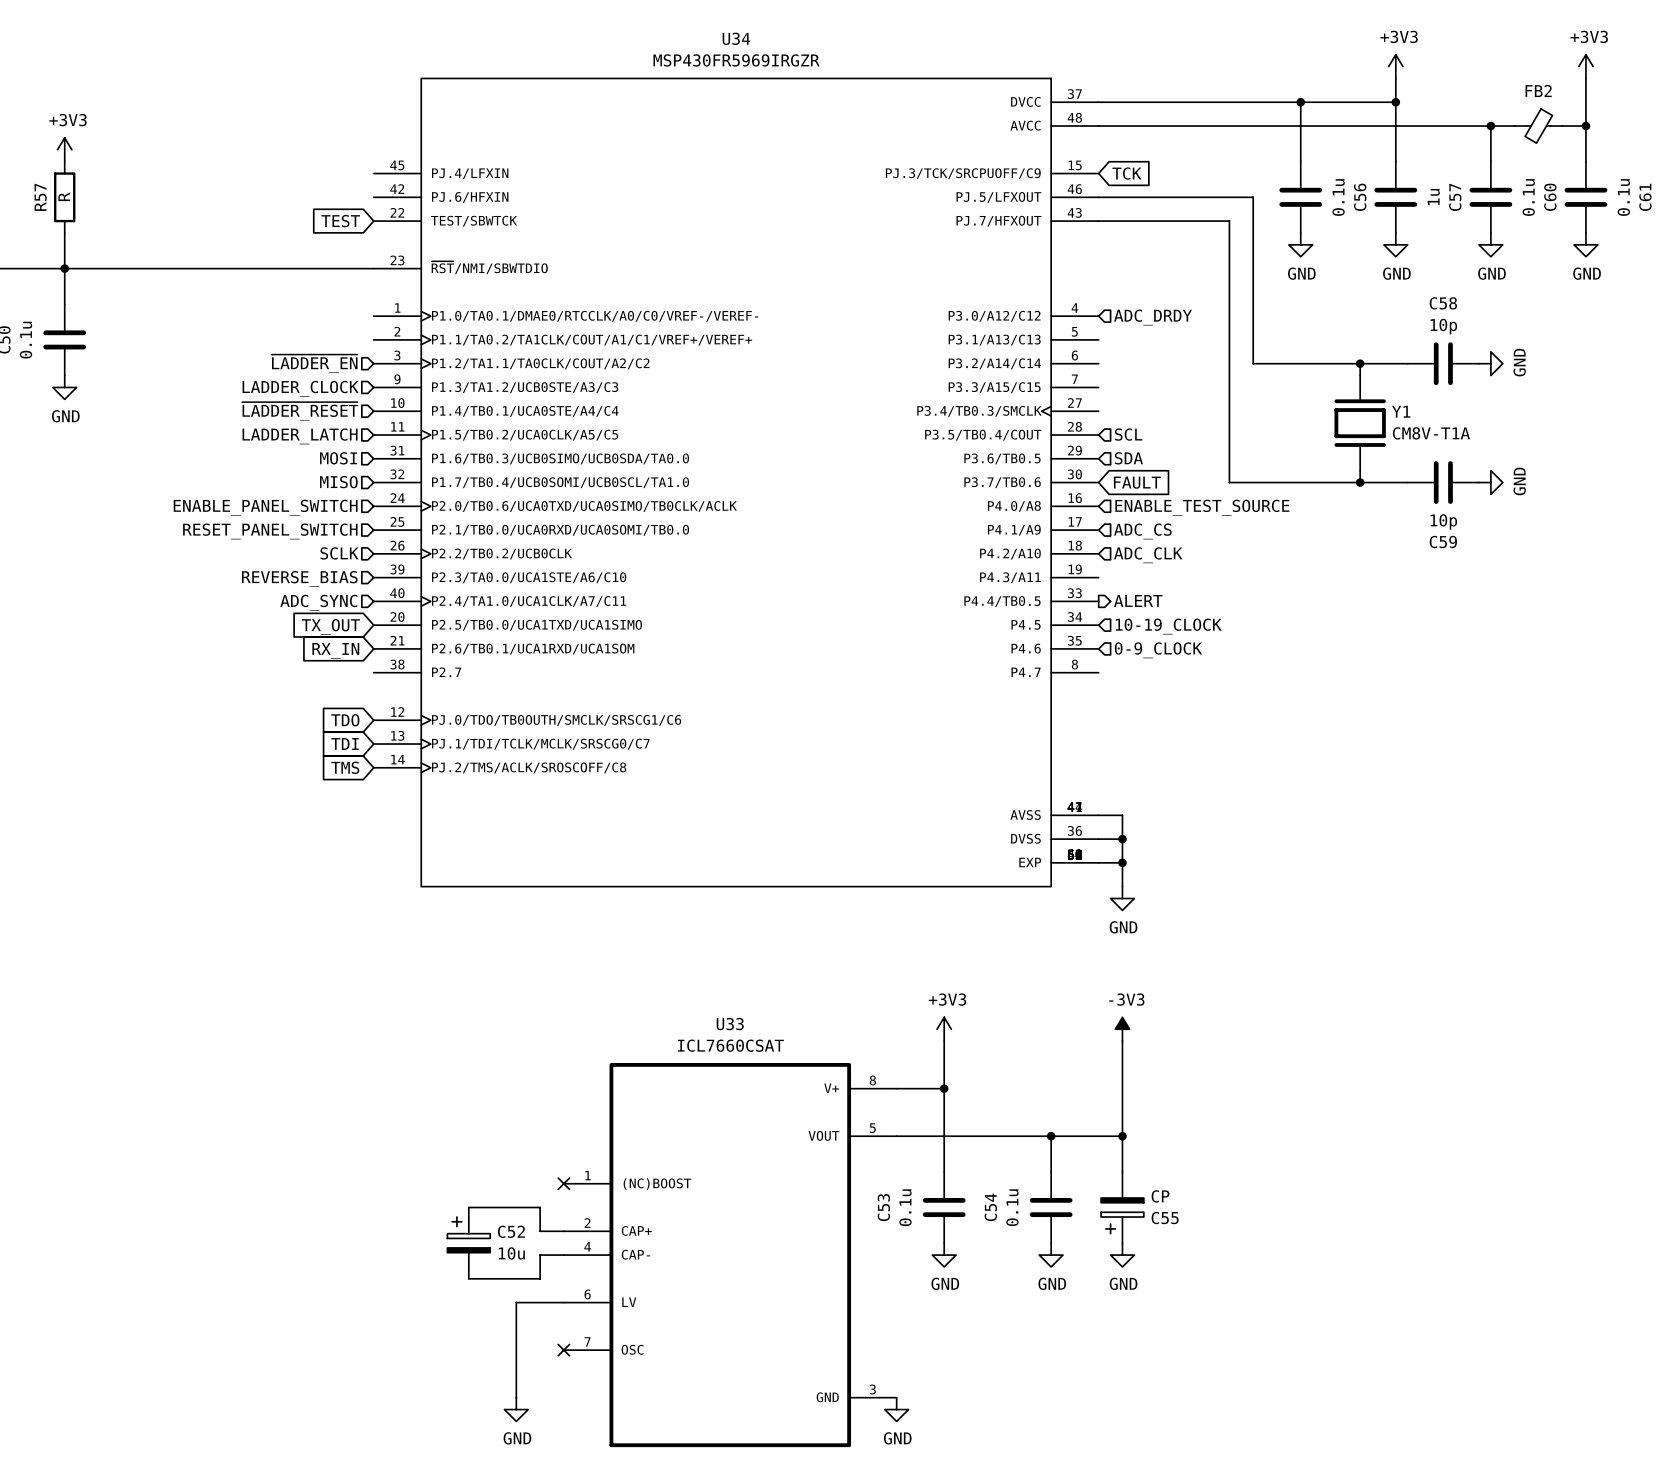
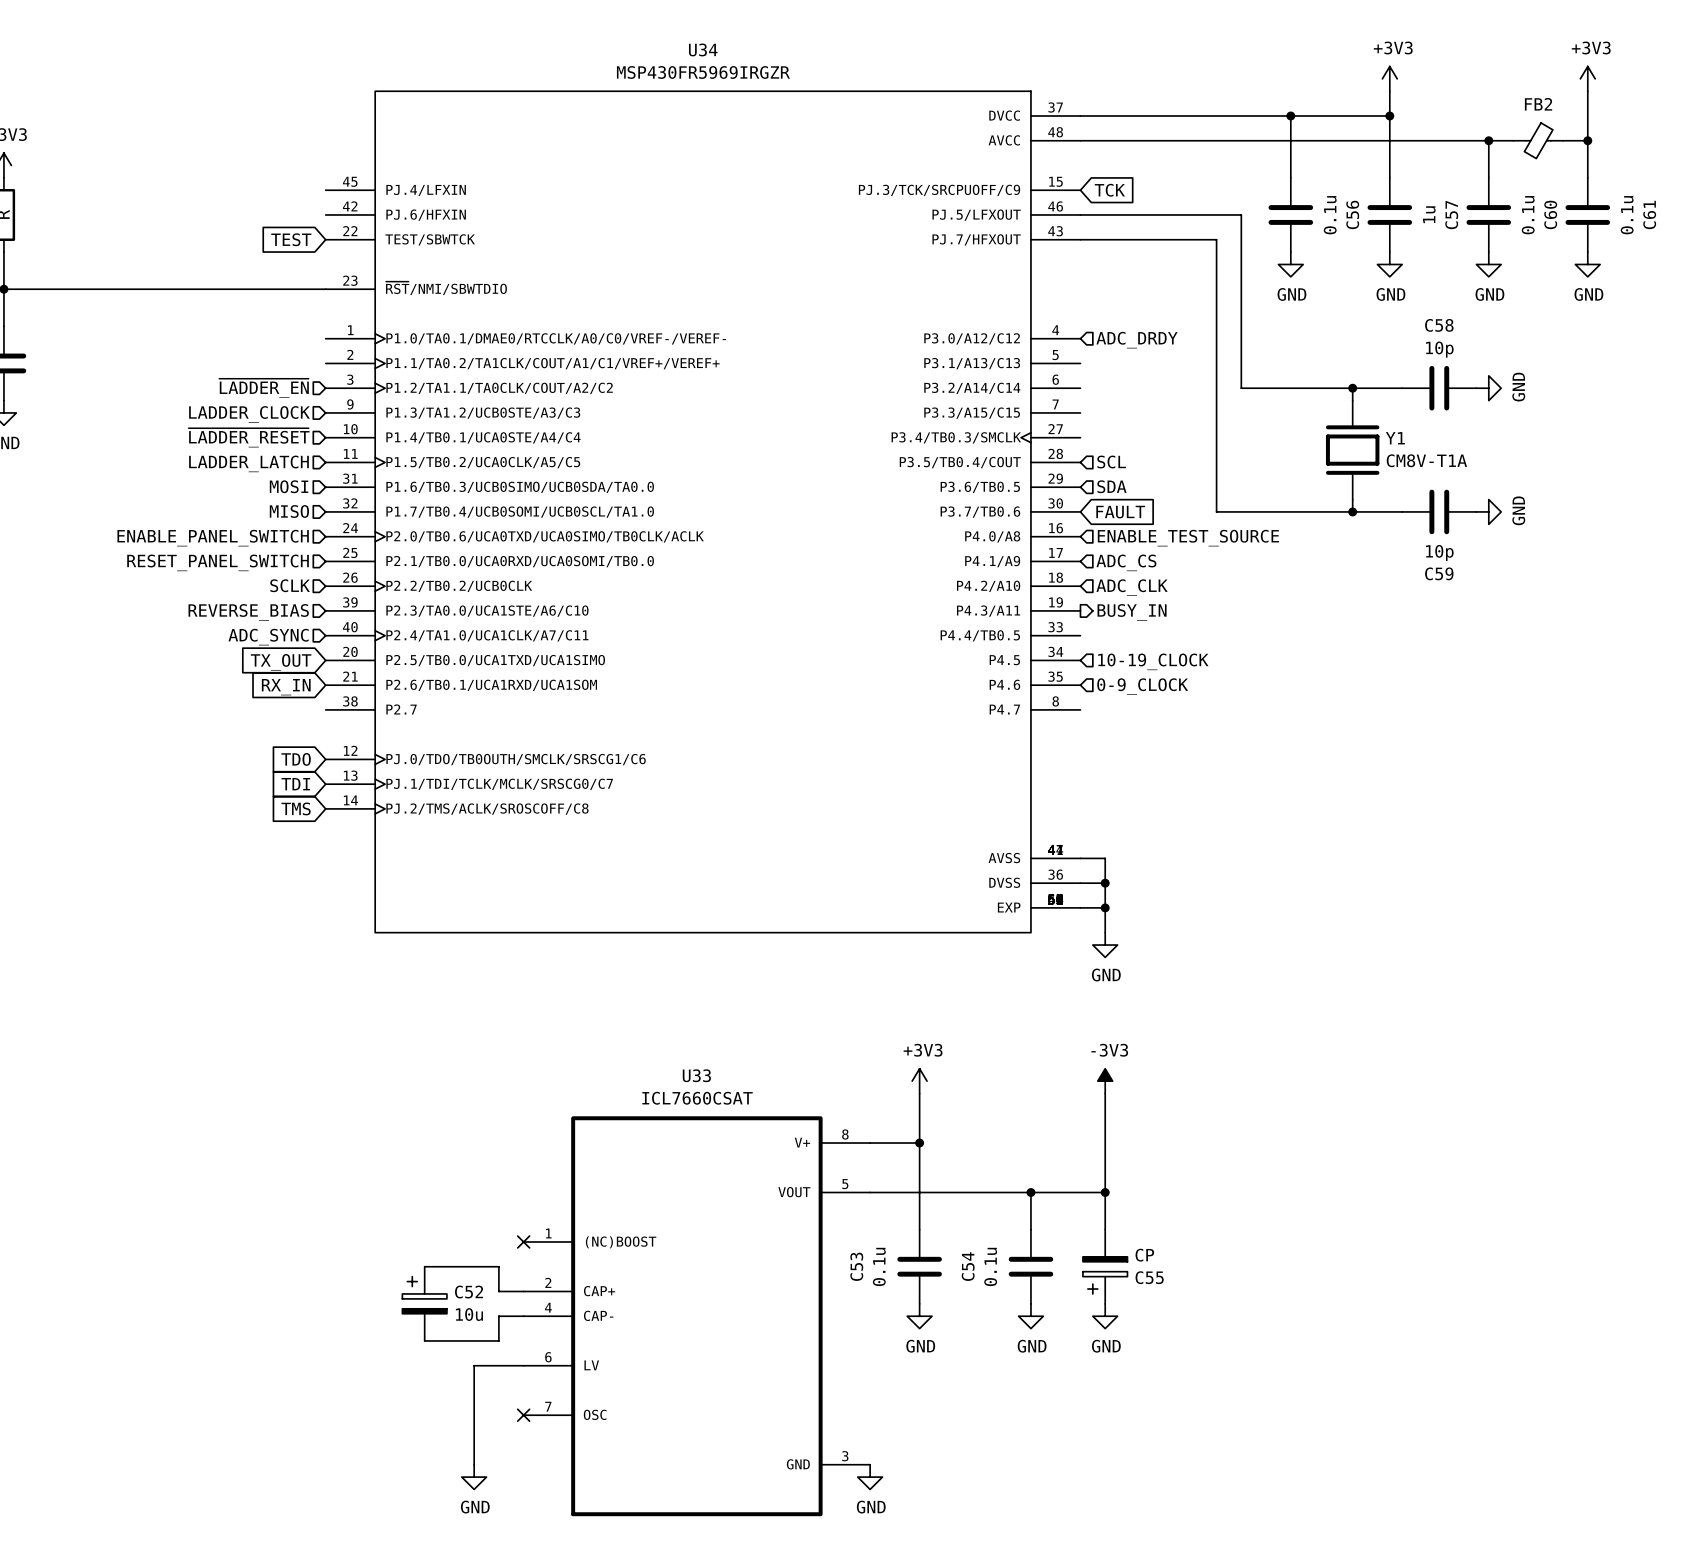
hierarchical label: none -> BUSY_IN (1132, 612)
hierarchical label: ALERT (1138, 600) -> none

